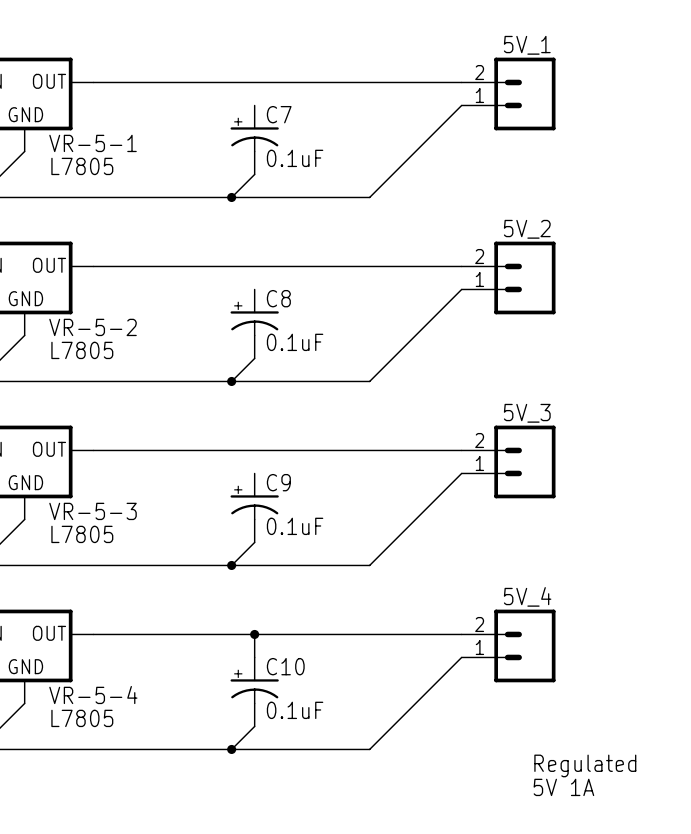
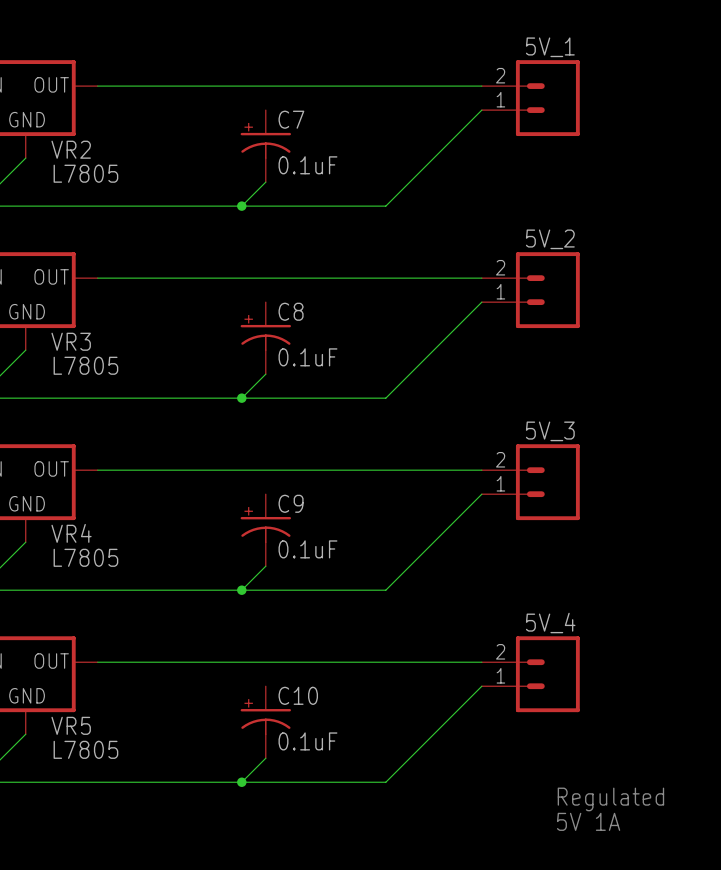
VR-5-1 name: VR-5-1 (93, 143) -> VR2 (71, 149)
VR-5-2 name: VR-5-2 (93, 327) -> VR3 (71, 341)
VR-5-3 name: VR-5-3 (93, 511) -> VR4 (71, 533)
wire: (254, 634) (254, 657) -> none
junction: (254, 634) -> none
VR-5-4 name: VR-5-4 (93, 695) -> VR5 (71, 725)

